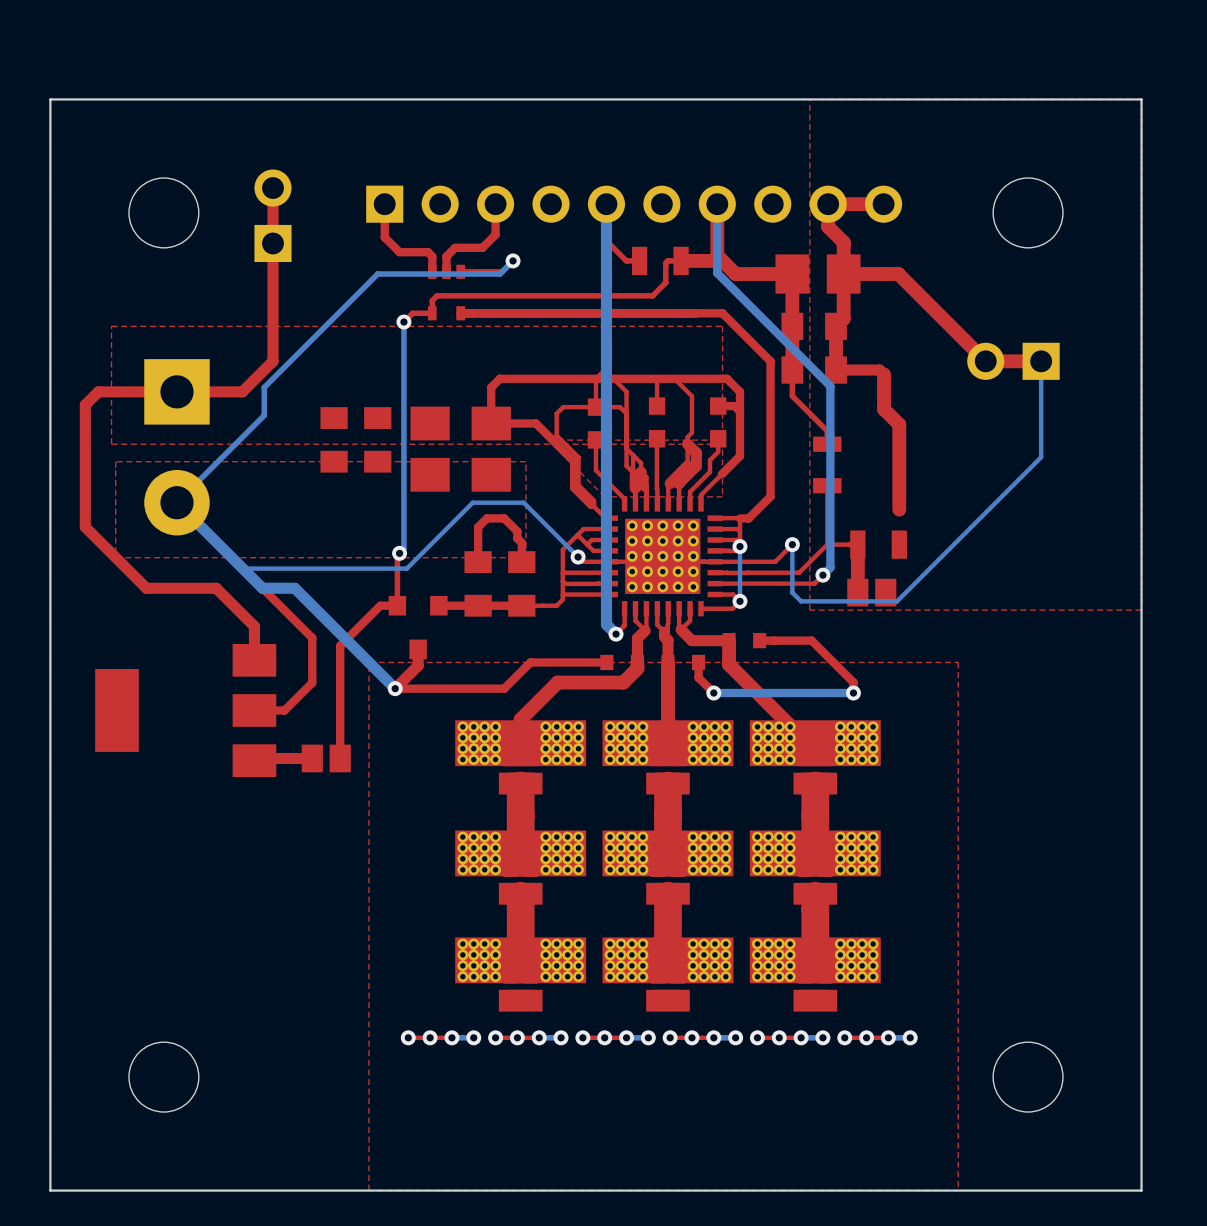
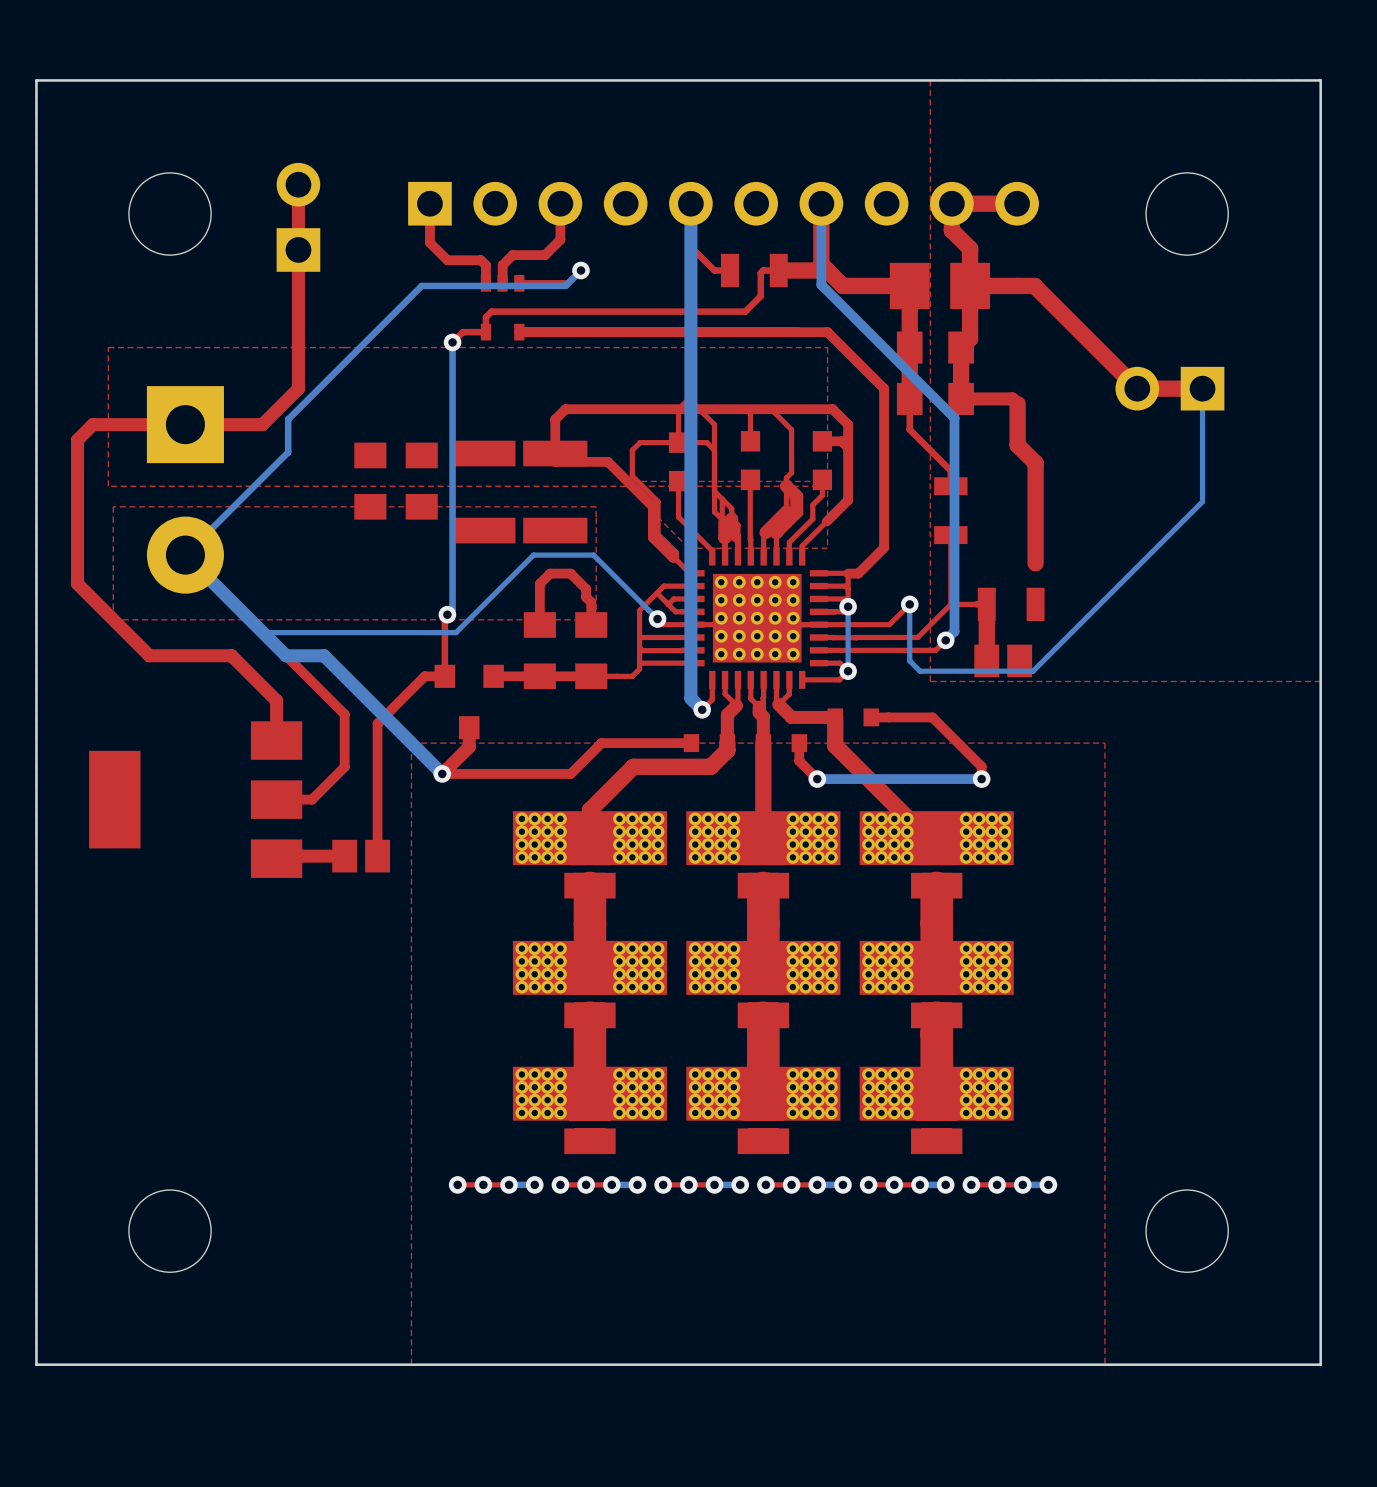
part footprint: [410, 406, 450, 492] -> [451, 440, 516, 544]
part footprint: [471, 406, 511, 492] -> [523, 440, 588, 544]

